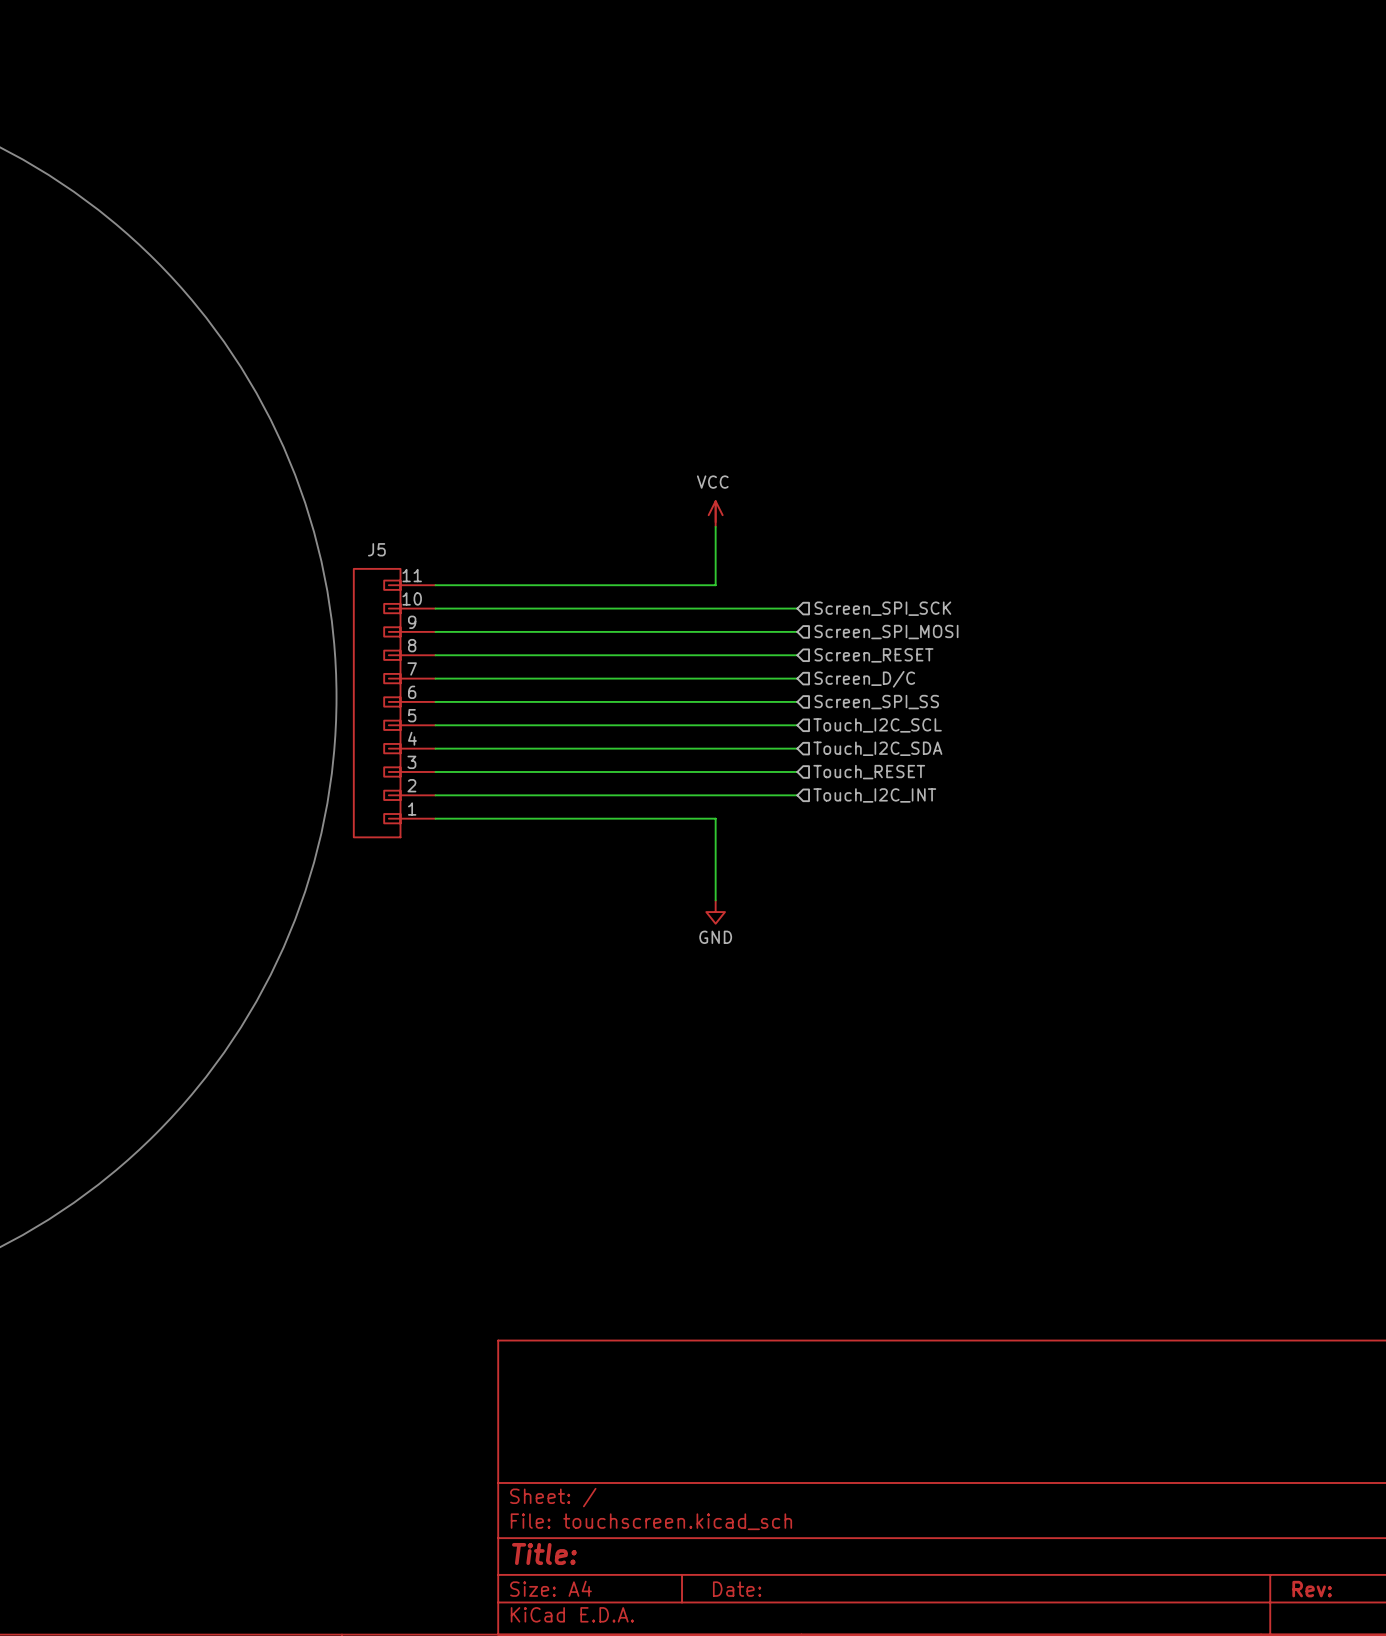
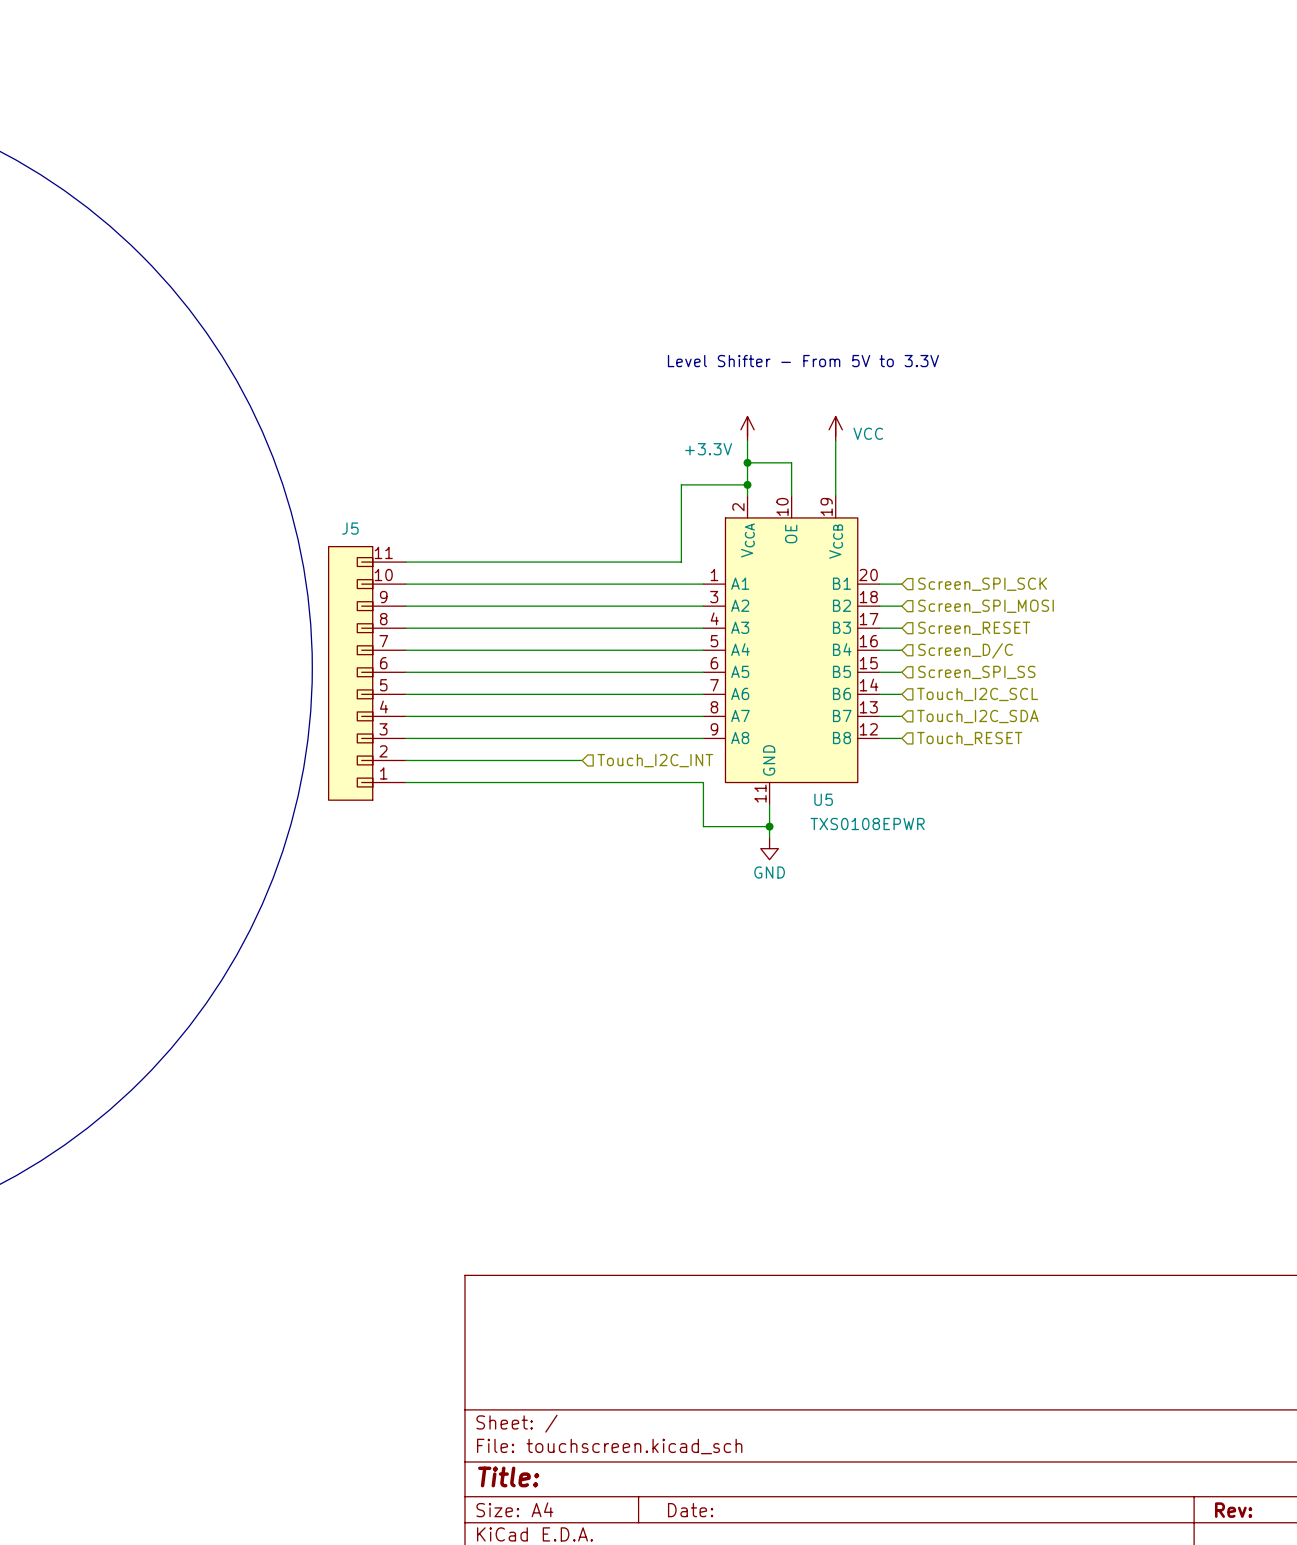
text: none -> Level Shifter - From 5V to 3.3V (803, 361)
power symbol: none -> +3.3V (747, 428)
wire: none -> (747, 440) (747, 495)
wire: none -> (835, 440) (835, 495)
wire: none -> (747, 462) (791, 462) (791, 495)
junction: none -> (747, 462)
power symbol text position: VCC (712, 482) -> VCC (868, 433)
junction: none -> (747, 484)
power symbol position: VCC (715, 514) -> VCC (835, 428)
wire: (715, 526) (715, 585) -> (747, 484) (681, 484) (681, 562) (670, 562)
hierarchical label position: Screen_SPI_SCK (882, 608) -> Screen_SPI_SCK (982, 584)
wire: none -> (879, 584) (901, 584)
wire: none -> (879, 606) (901, 606)
hierarchical label position: Screen_SPI_MOSI (886, 632) -> Screen_SPI_MOSI (986, 606)
hierarchical label position: Screen_RESET (873, 655) -> Screen_RESET (974, 628)
wire: none -> (879, 628) (901, 628)
U5: none -> TXS0108EPWR (791, 650)
wire: none -> (879, 650) (901, 650)
hierarchical label position: Screen_D/C (864, 679) -> Screen_D/C (965, 650)
wire: none -> (879, 672) (901, 672)
hierarchical label position: Screen_SPI_SS (876, 702) -> Screen_SPI_SS (976, 672)
hierarchical label position: Touch_I2C_SCL (877, 725) -> Touch_I2C_SCL (977, 694)
wire: none -> (879, 694) (901, 694)
hierarchical label position: Touch_I2C_SDA (877, 748) -> Touch_I2C_SDA (977, 716)
wire: none -> (879, 716) (901, 716)
wire: none -> (879, 738) (901, 738)
hierarchical label position: Touch_RESET (869, 772) -> Touch_RESET (969, 738)
wire: (622, 795) (797, 795) -> none
hierarchical label position: Touch_I2C_INT (874, 795) -> Touch_I2C_INT (655, 760)
wire: (715, 818) (715, 900) -> (670, 782) (703, 782) (703, 826) (769, 826)
wire: none -> (769, 804) (769, 837)
junction: none -> (769, 826)
power symbol position: GND (715, 912) -> GND (769, 848)

